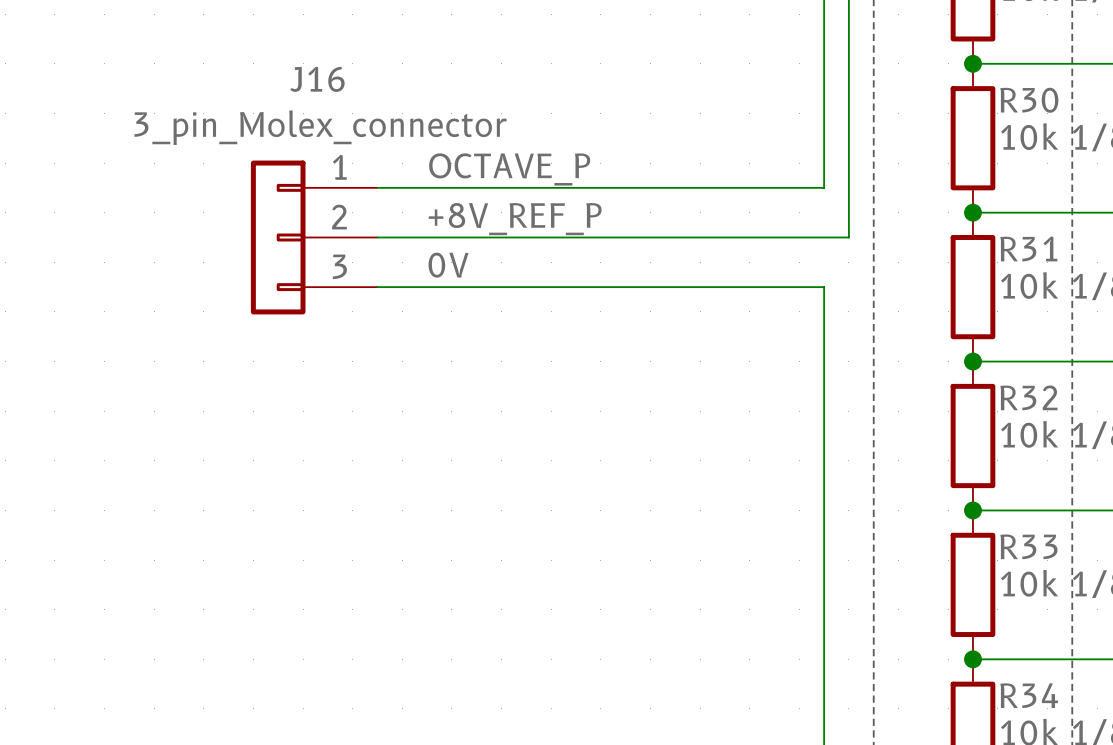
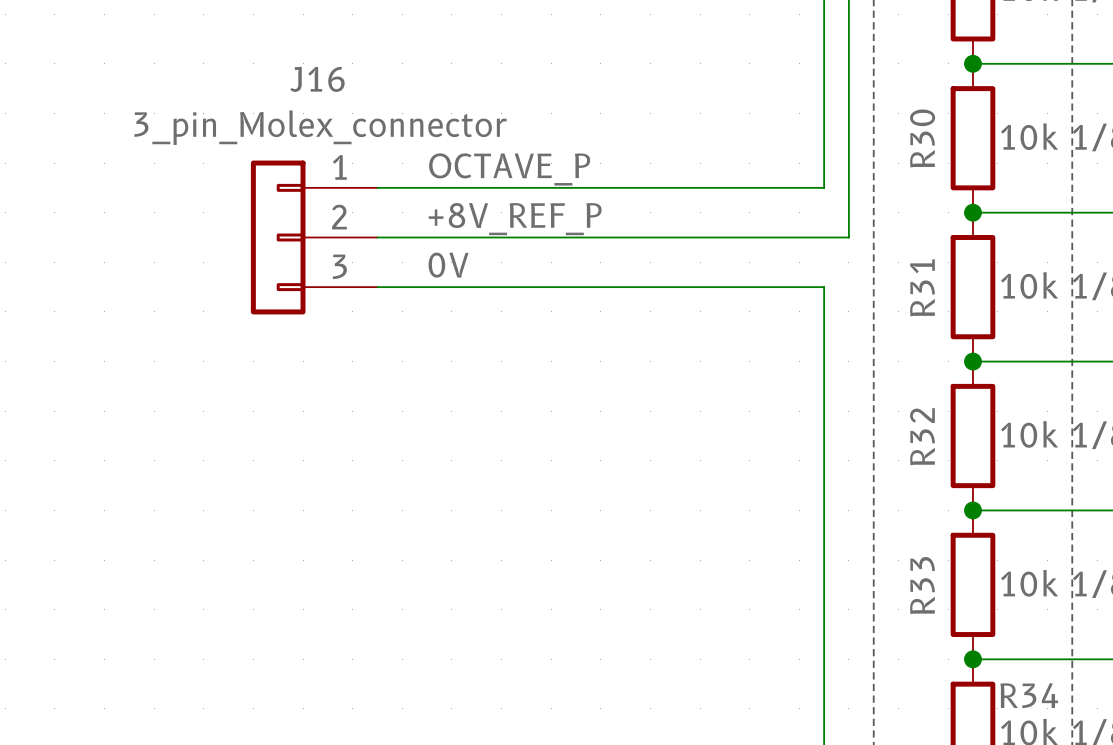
R30 name rotation: 0° (1029, 100) -> 90° counterclockwise (922, 138)
R30 name position: R30 (1029, 100) -> R30 (922, 138)
R31 name rotation: 0° (1028, 248) -> 90° counterclockwise (922, 287)
R31 name position: R31 (1028, 248) -> R31 (922, 287)
R32 name rotation: 0° (1028, 397) -> 90° counterclockwise (922, 436)
R32 name position: R32 (1028, 397) -> R32 (922, 436)
R33 name rotation: 0° (1028, 546) -> 90° counterclockwise (922, 585)
R33 name position: R33 (1028, 546) -> R33 (922, 585)

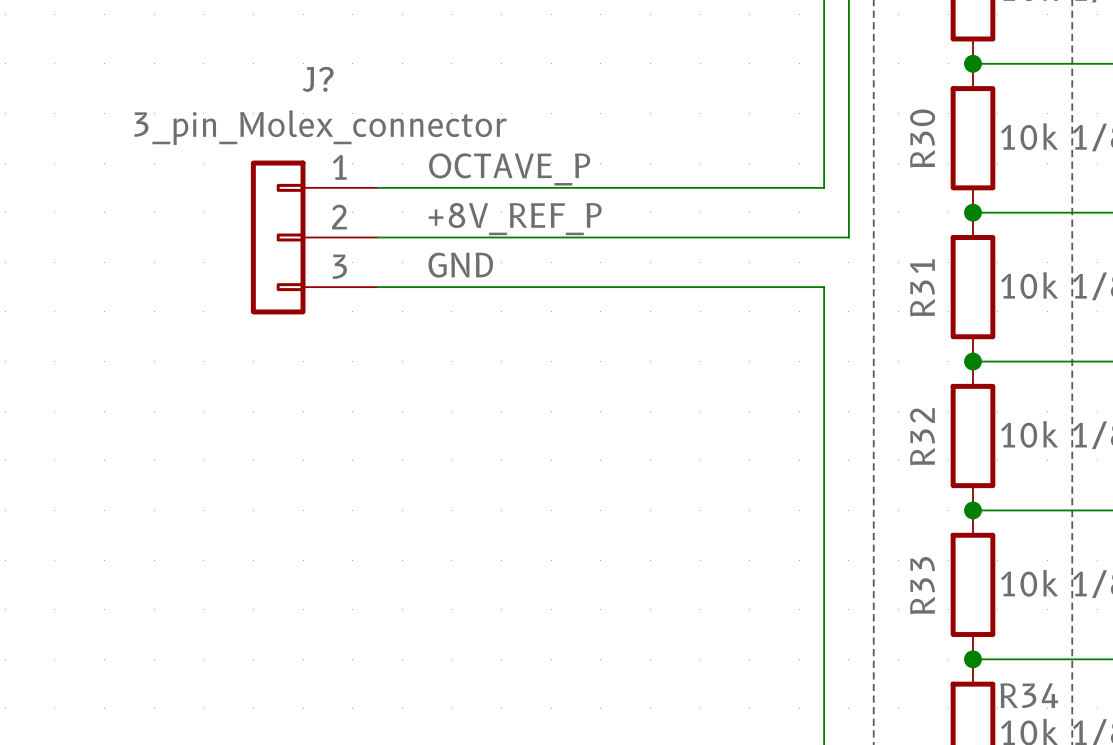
J16 name: J16 (317, 79) -> J? (318, 79)
label: 0V (448, 265) -> GND (460, 265)

